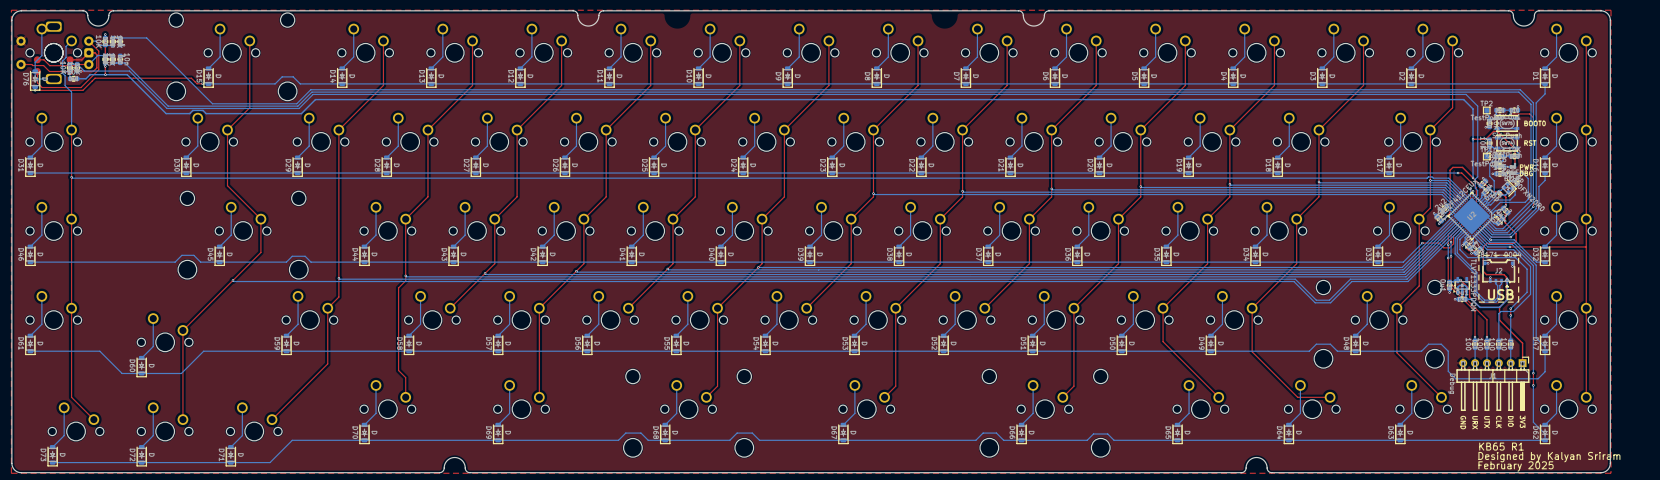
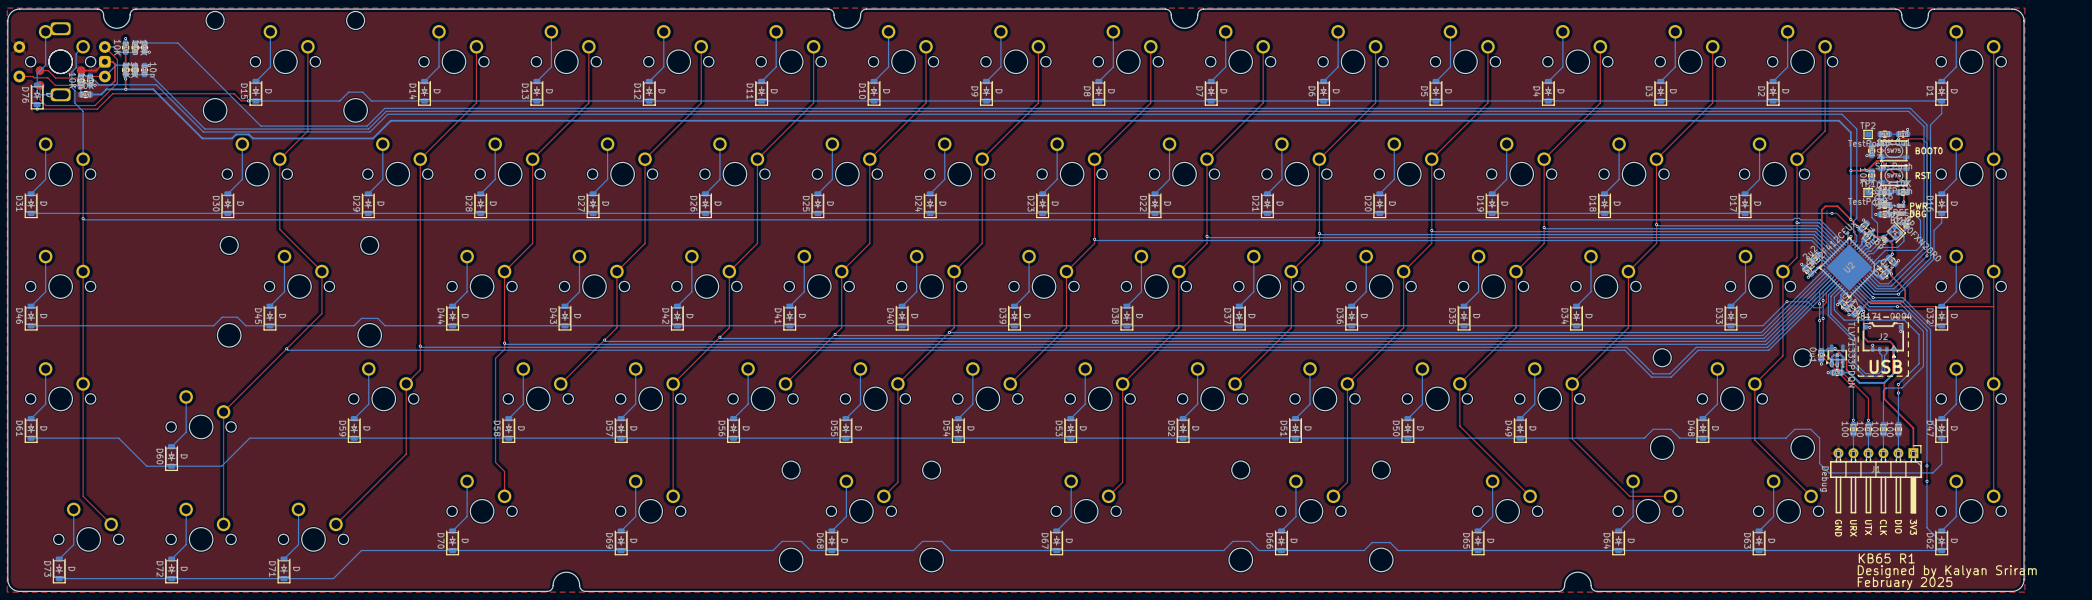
board edge: (1610, 20) (1607, 13) (1600, 10) (1538, 10) (1535, 13) (1531, 22) (1523, 26) (1516, 22) (1512, 13) (1508, 10) (1049, 10) (1045, 13) (1041, 22) (1033, 26) (1026, 22) (1022, 13) (1018, 10) (603, 10) (599, 13) (595, 23) (588, 26) (581, 23) (577, 13) (573, 10) (113, 10) (109, 13) (106, 22) (98, 26) (90, 22) (87, 13) (84, 10) (21, 10) (14, 13) (11, 20) -> (2024, 20) (2020, 12) (2012, 9) (1932, 9) (1929, 11) (1924, 24) (1915, 28) (1905, 24) (1900, 11) (1895, 9) (1203, 9) (1198, 11) (1193, 24) (1184, 28) (1175, 24) (1170, 11) (1165, 9) (865, 9) (861, 11) (856, 24) (847, 28) (837, 24) (833, 11) (828, 9) (136, 9) (131, 11) (125, 24) (116, 28) (106, 23) (102, 12) (98, 9) (19, 9) (11, 12) (7, 20)

